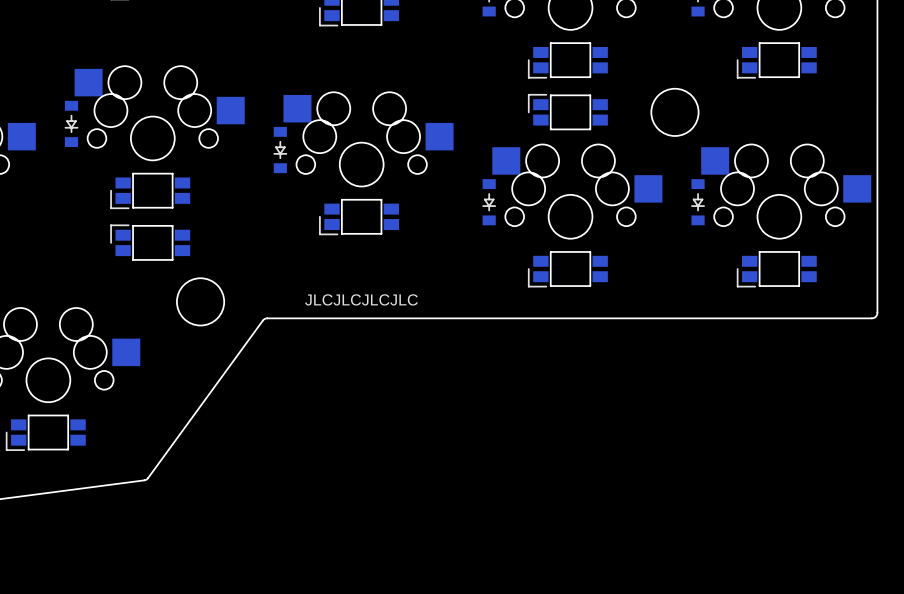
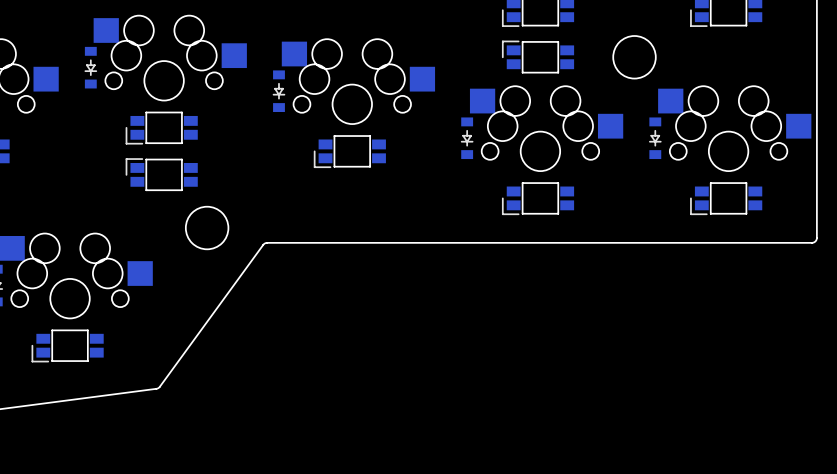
text: JLCJLCJLCJLC (361, 299) -> none

